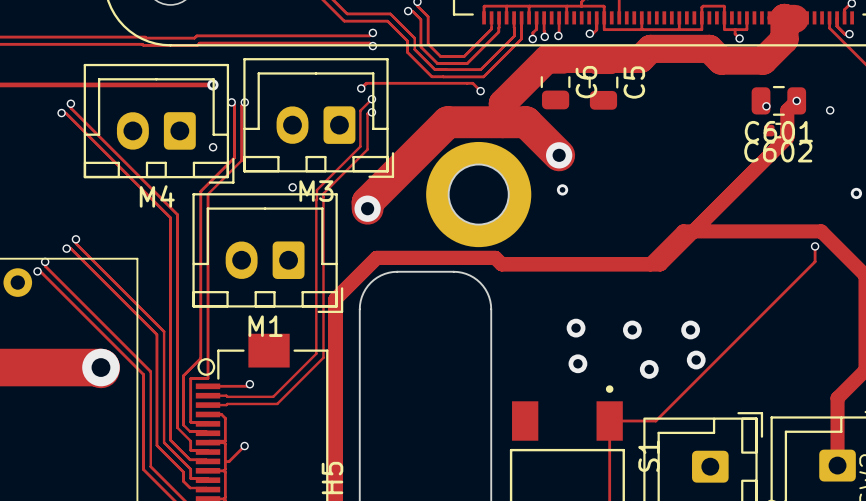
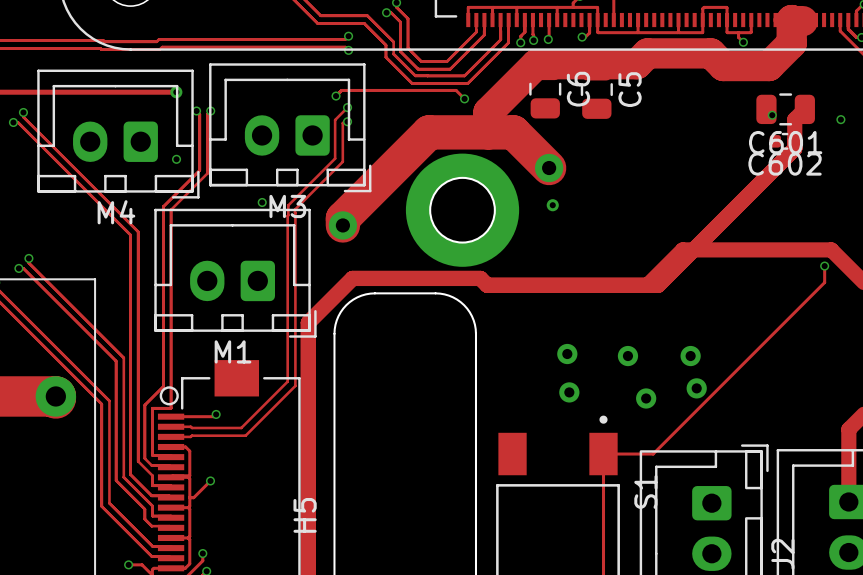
via: (796, 100) -> none

